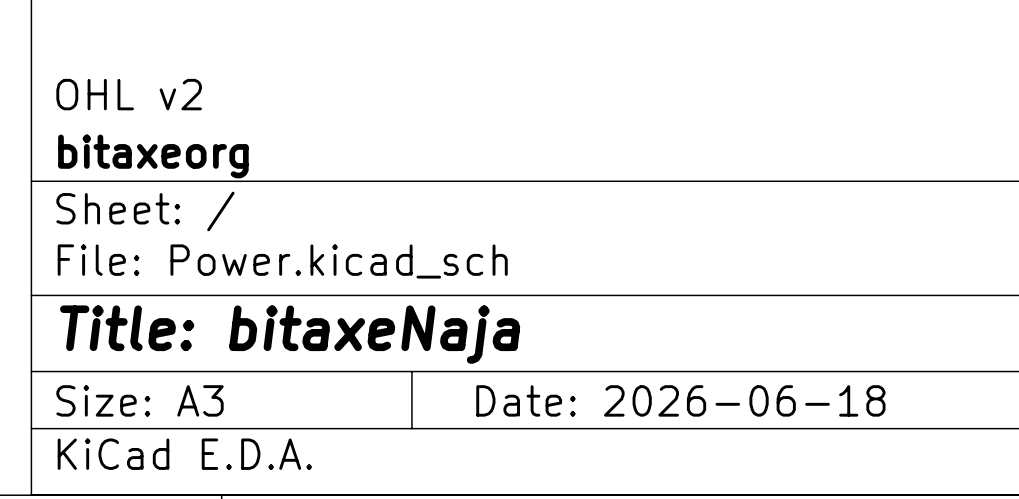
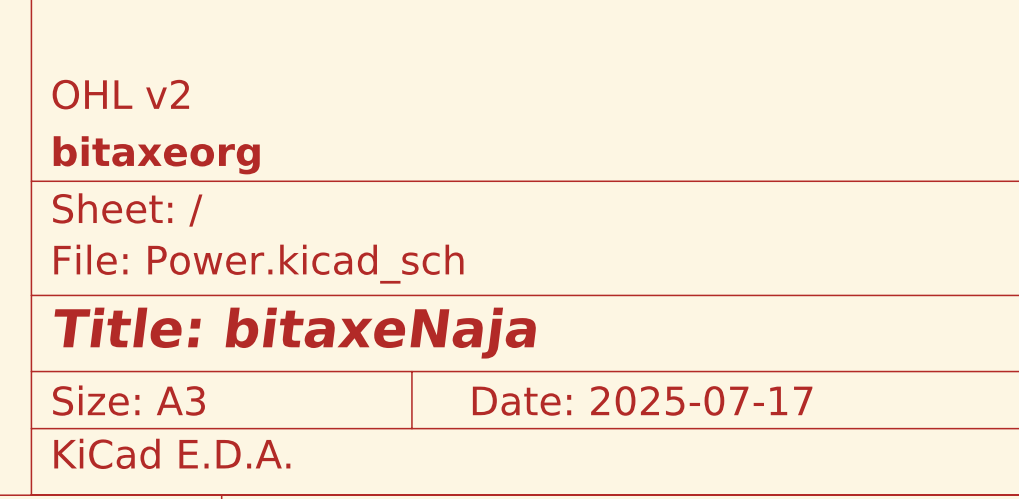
title block: Date: 2026-06-18 (680, 400) -> Date: 2025-07-17 (642, 400)

